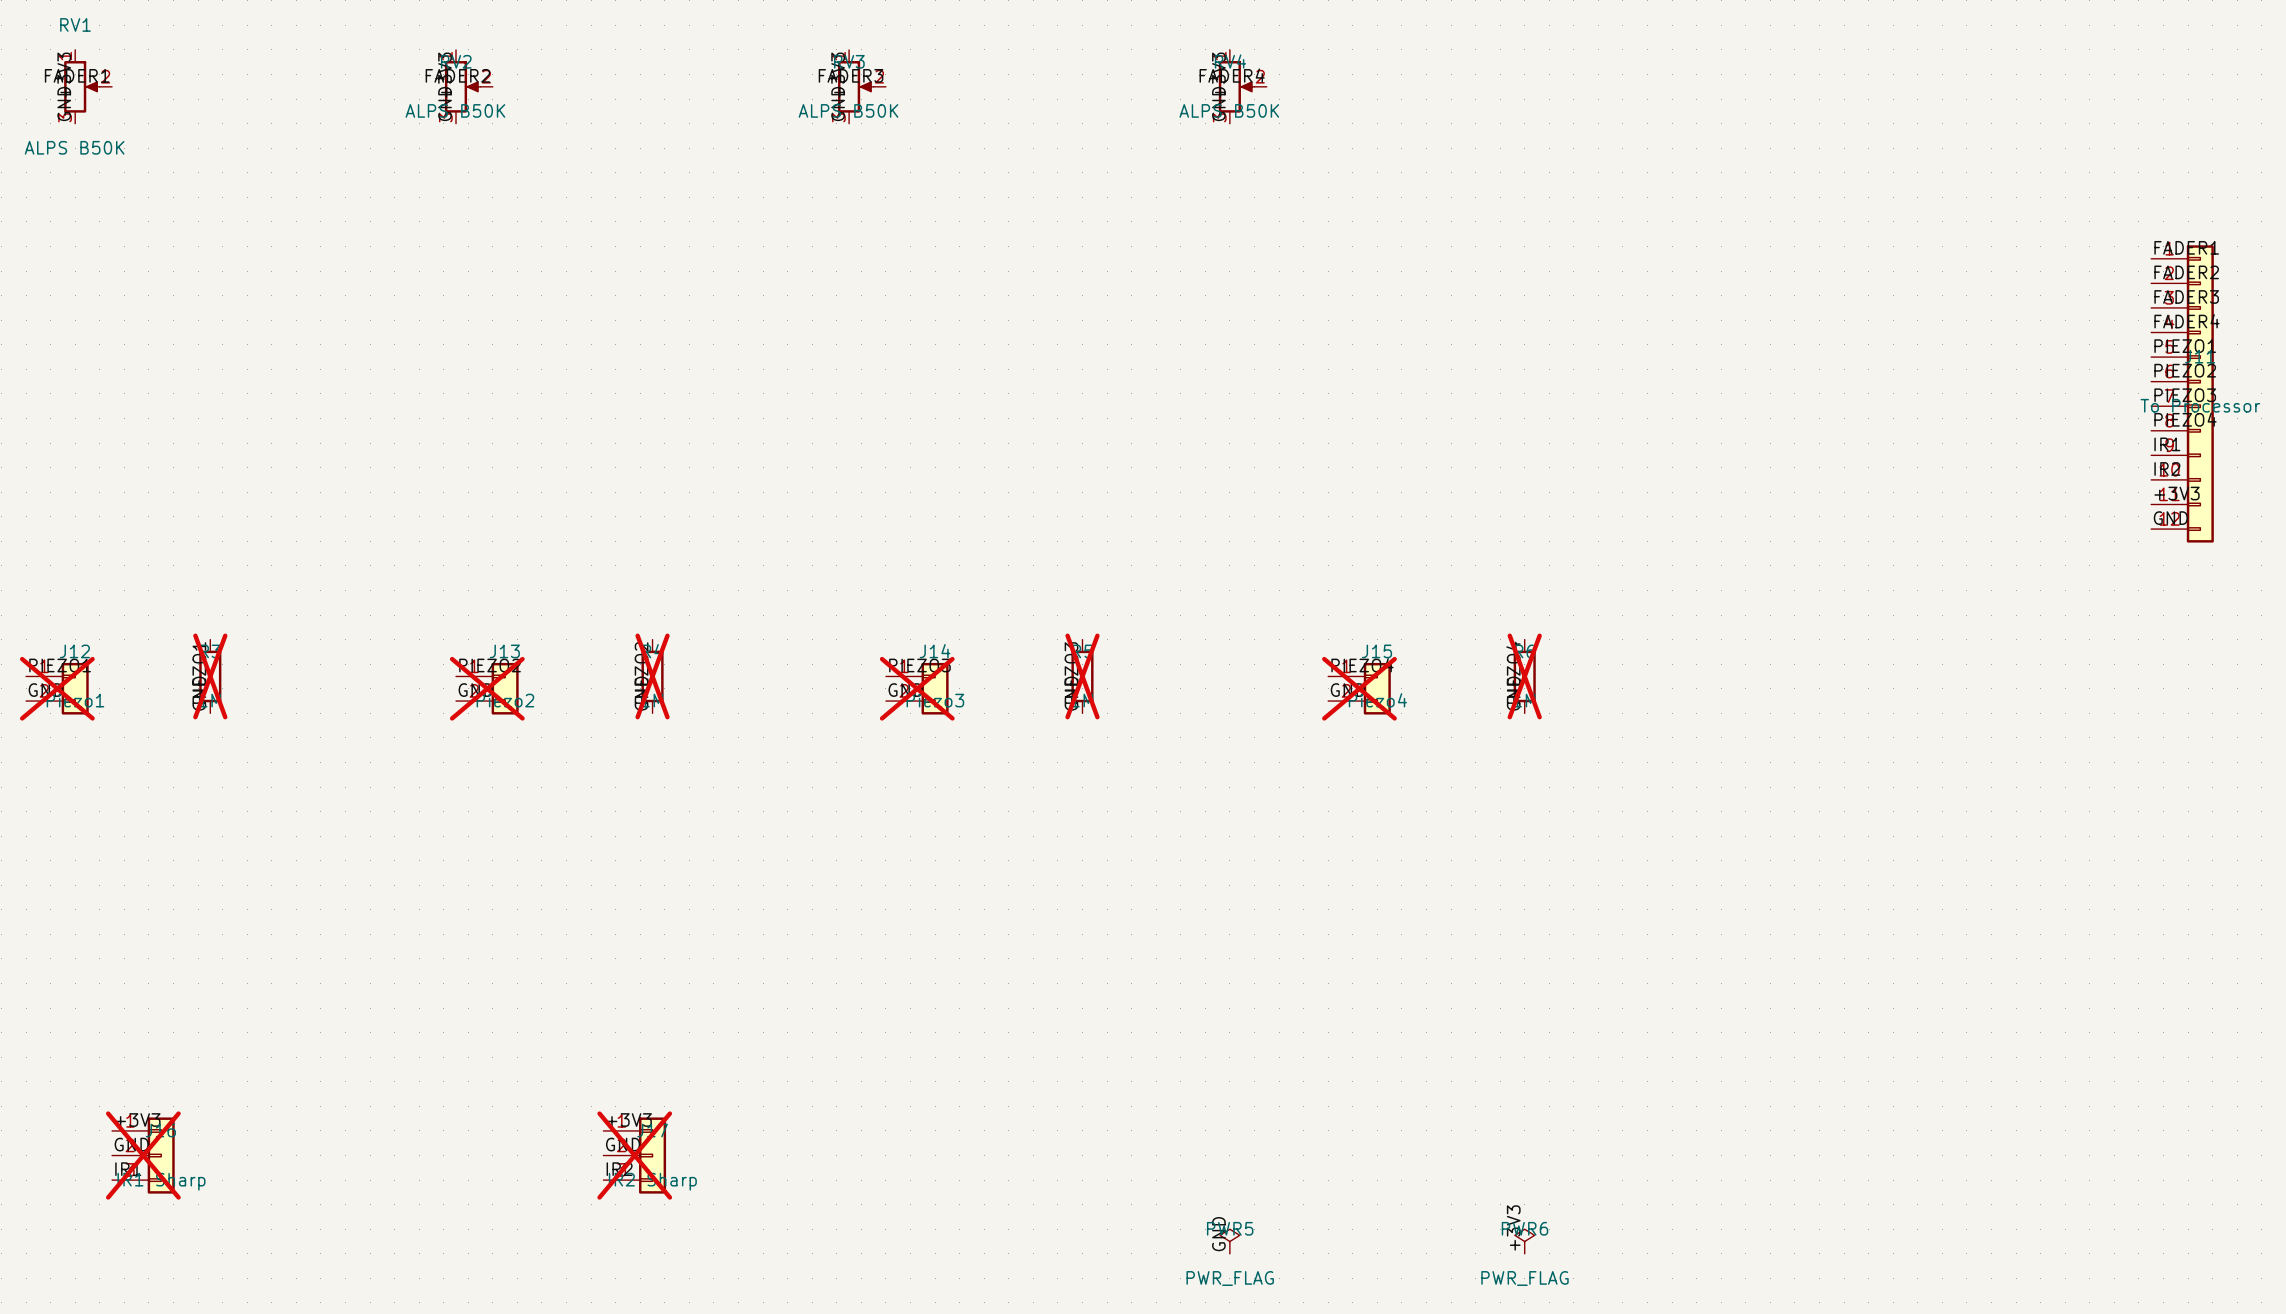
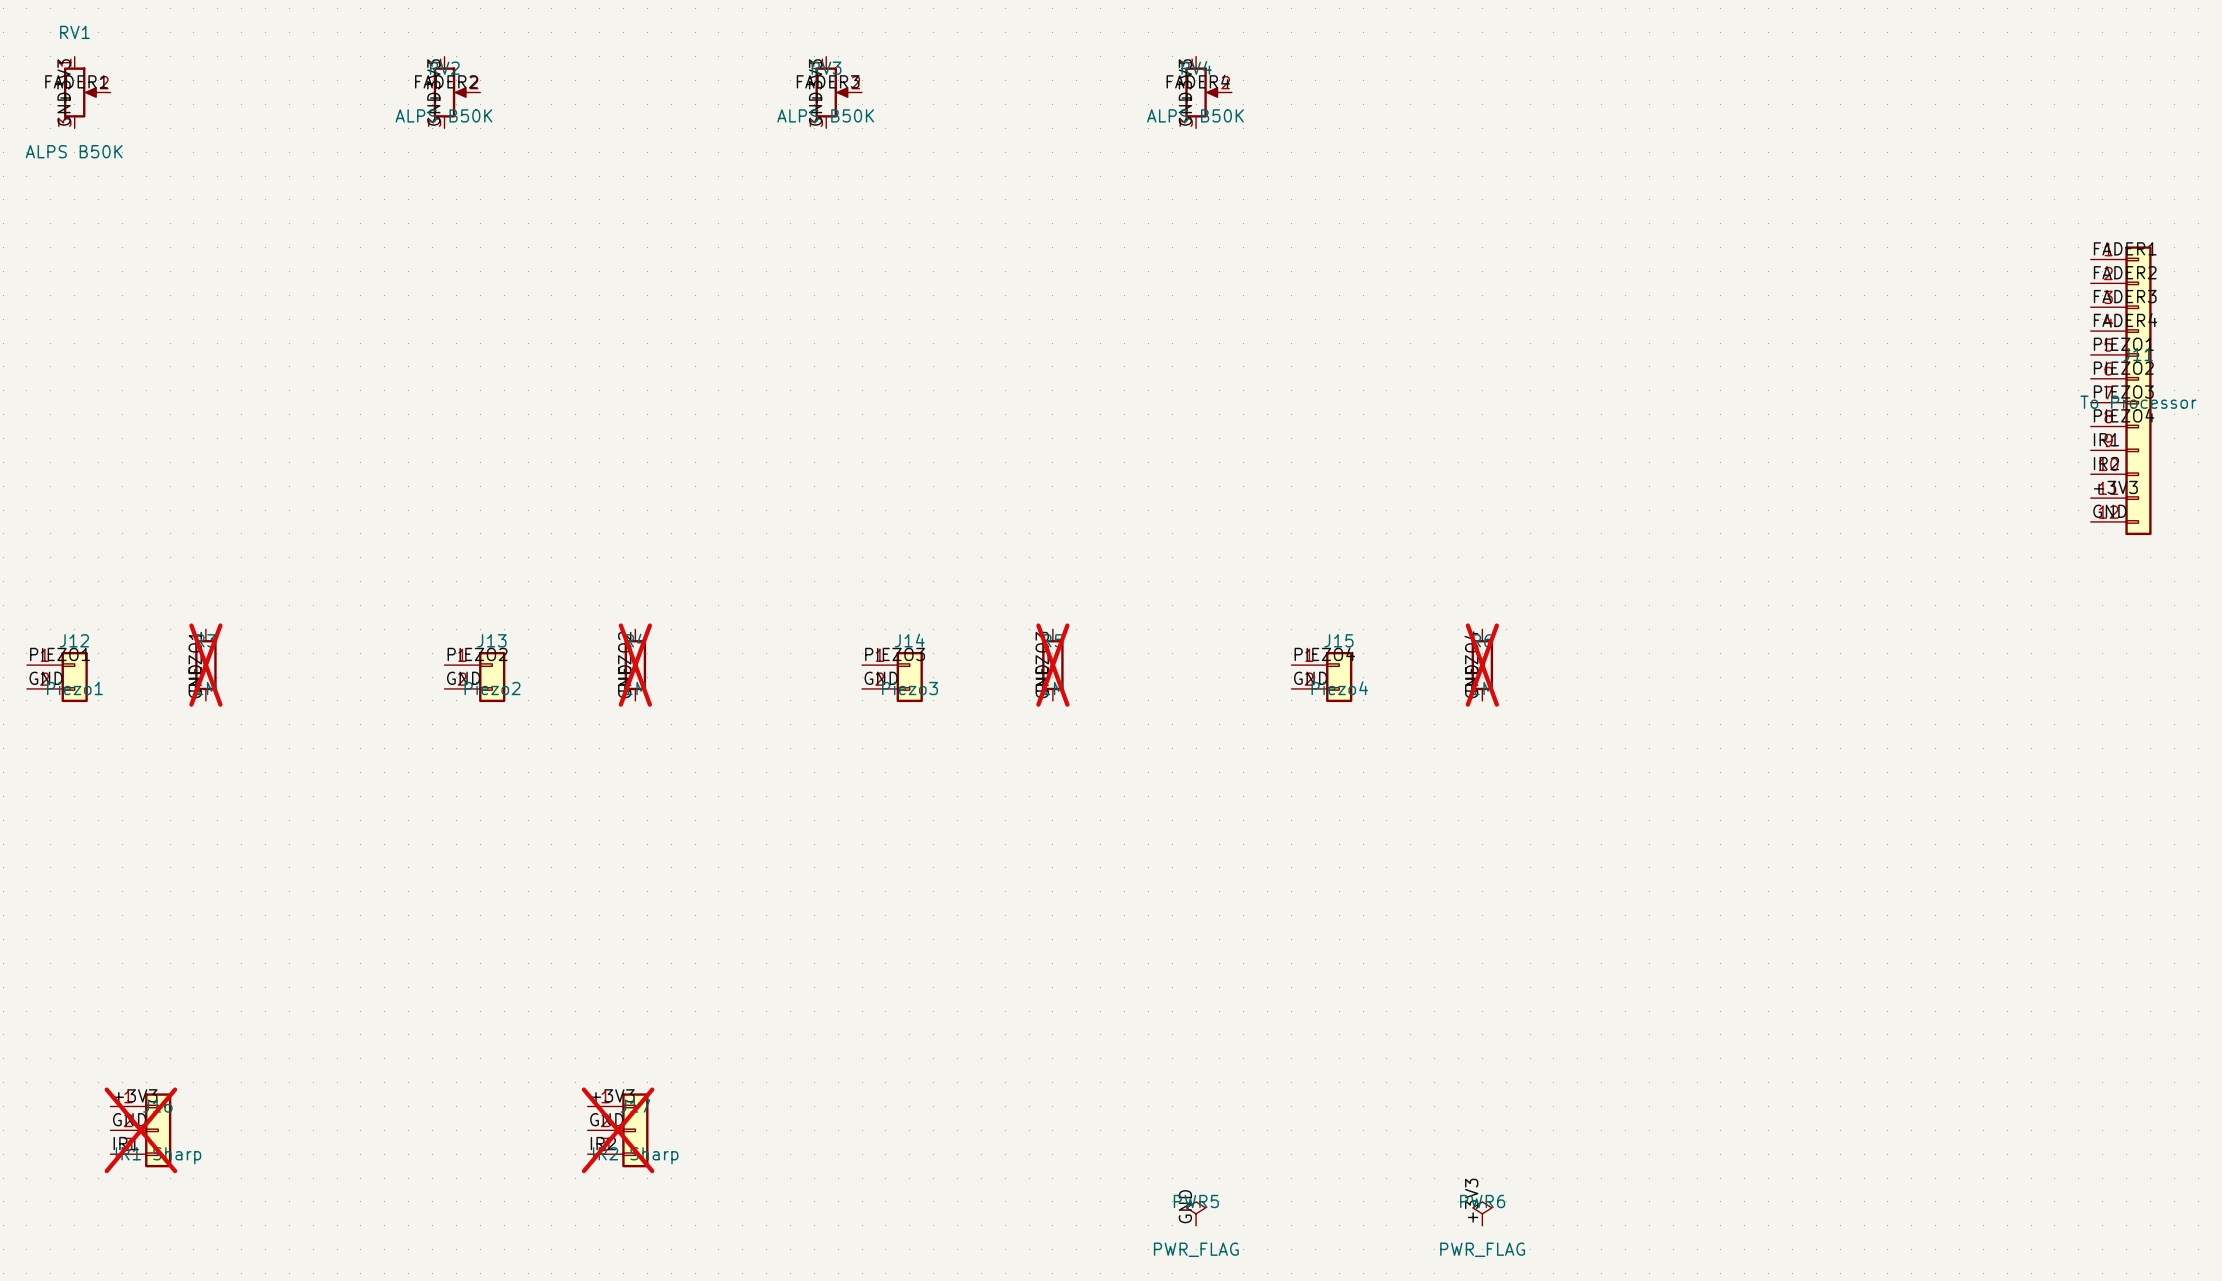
J12 do-not-place cross: (57, 688) -> none
J13 do-not-place cross: (487, 688) -> none
J14 do-not-place cross: (917, 688) -> none
J15 do-not-place cross: (1359, 688) -> none

